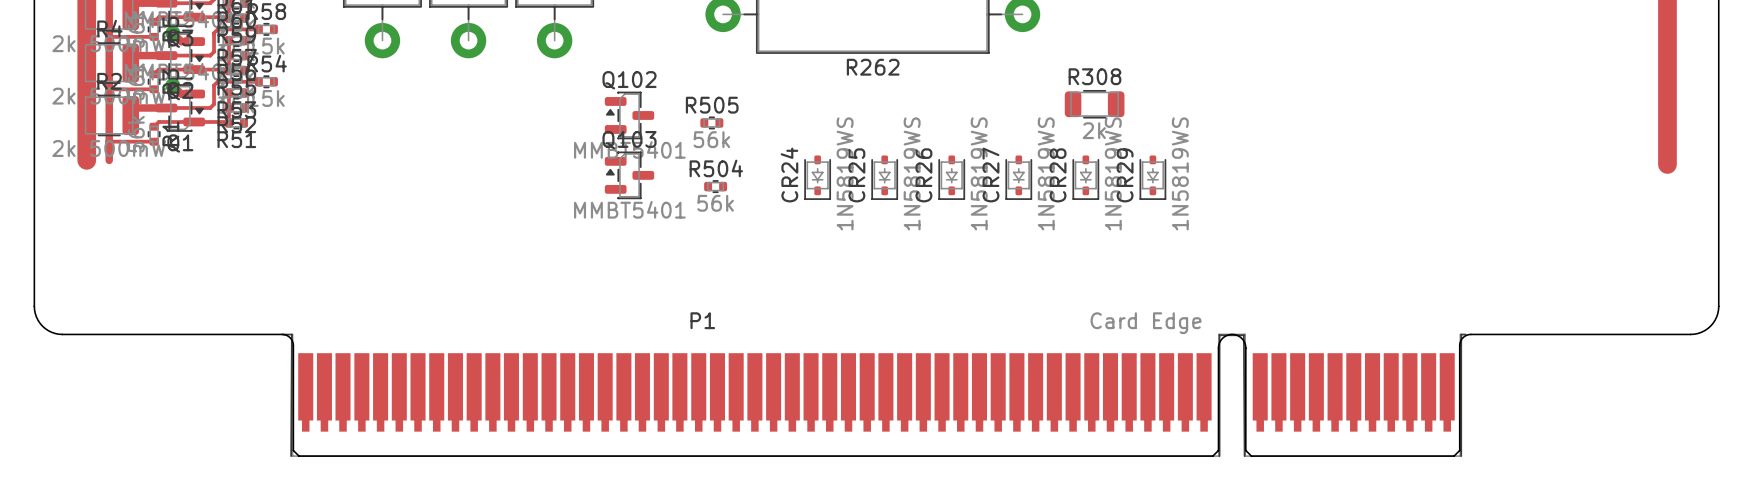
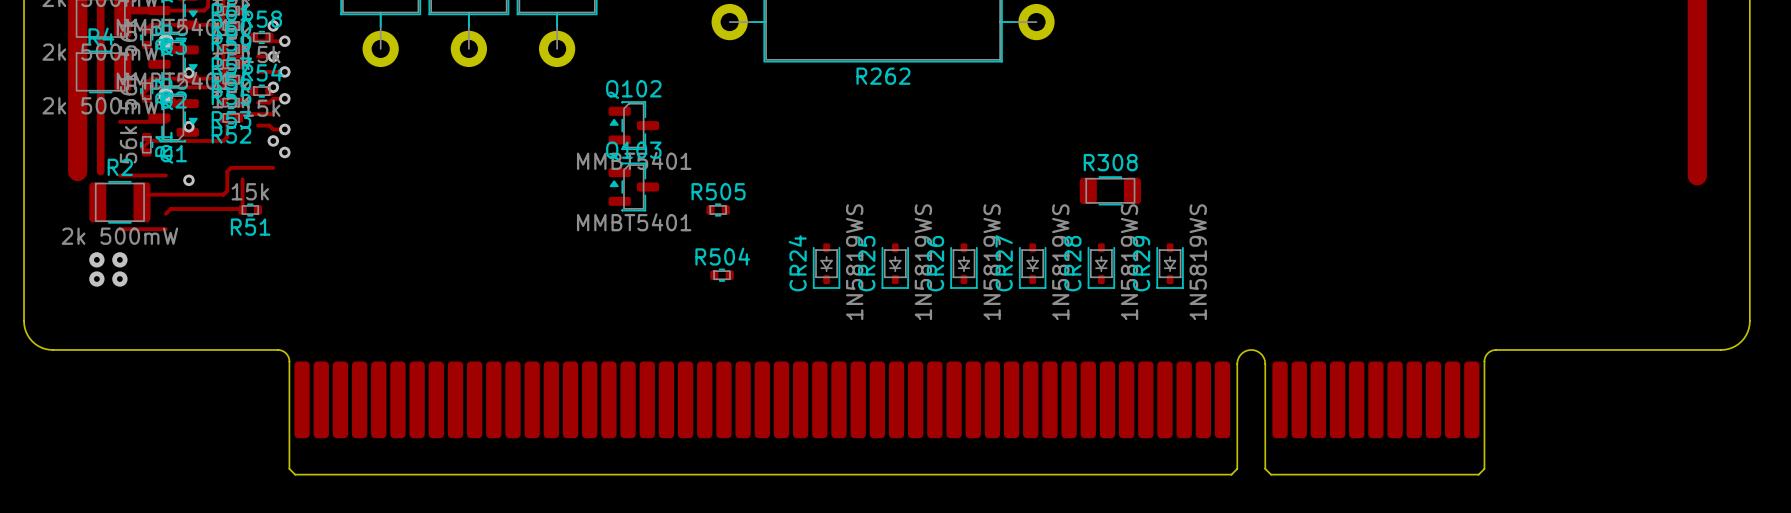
via: none -> (273, 25)
track: (258, 29) (217, 29) (214, 33) (214, 51) (210, 55) (138, 55) -> none
track: none -> (257, 41) (284, 41)
via: none -> (284, 41)
track: (109, 36) (154, 36) -> (119, 121) (165, 121)
track: none -> (242, 56) (231, 56) (227, 60) (227, 83) (223, 87) (149, 87) (141, 94)
track: none -> (257, 56) (273, 56)
via: none -> (273, 56)
track: none -> (257, 71) (284, 71)
via: none -> (284, 71)
via: none -> (188, 72)
via: none -> (273, 87)
track: (258, 81) (217, 81) (214, 85) (214, 104) (210, 107) (138, 107) -> none
track: (109, 89) (154, 89) -> (119, 175) (165, 175)
track: none -> (284, 98) (273, 98) (269, 102) (257, 102)
via: none -> (284, 98)
track: (228, 93) (228, 122) (158, 121) (154, 126) -> (242, 179) (242, 209) (170, 209) (165, 213)
track: none -> (273, 114) (231, 114) (227, 117) (227, 137) (223, 140) (149, 140) (141, 148)
R308 position: (1094, 104) -> (1110, 190)
R2 position: (109, 115) -> (119, 202)
track: none -> (257, 125) (269, 125) (273, 129) (288, 129)
via: none -> (188, 126)
via: none -> (284, 129)
R51 position: (236, 122) -> (250, 209)
R505 position: (711, 122) -> (718, 209)
via: none -> (273, 140)
R308 value: 2k (1094, 130) -> none
R505 value: 56k (711, 139) -> none
track: (109, 141) (154, 141) -> (119, 229) (165, 229)
via: none -> (284, 152)
track: none -> (273, 167) (231, 167) (227, 171) (227, 190) (223, 194) (149, 194) (141, 202)
via: none -> (188, 180)
CR24 position: (817, 177) -> (826, 266)
CR25 position: (884, 177) -> (895, 266)
CR26 position: (951, 177) -> (963, 266)
CR27 position: (1018, 177) -> (1032, 266)
CR28 position: (1085, 177) -> (1101, 266)
CR29 position: (1152, 177) -> (1170, 266)
R504 position: (715, 186) -> (722, 275)
R504 value: 56k (715, 203) -> none
via: none -> (96, 259)
via: none -> (119, 259)
via: none -> (96, 279)
via: none -> (119, 279)
board edge: (282, 334) (288, 336) (293, 344) (293, 450) (298, 456) (1212, 456) (1218, 450) (1218, 346) (1223, 337) (1232, 334) (1241, 337) (1245, 346) (1245, 450) (1251, 456) (1454, 456) (1459, 450) (1459, 344) (1463, 337) (1470, 334) -> none
P1: Card Edge (874, 395) -> none
part: none -> (886, 412)

